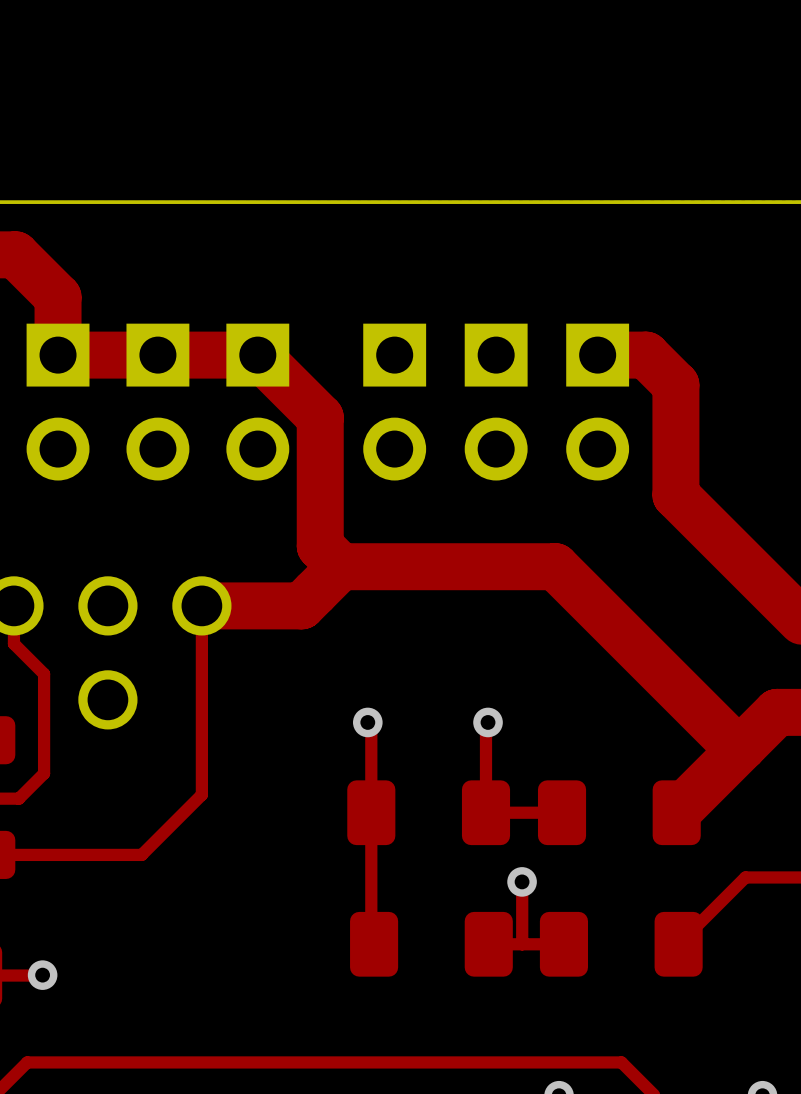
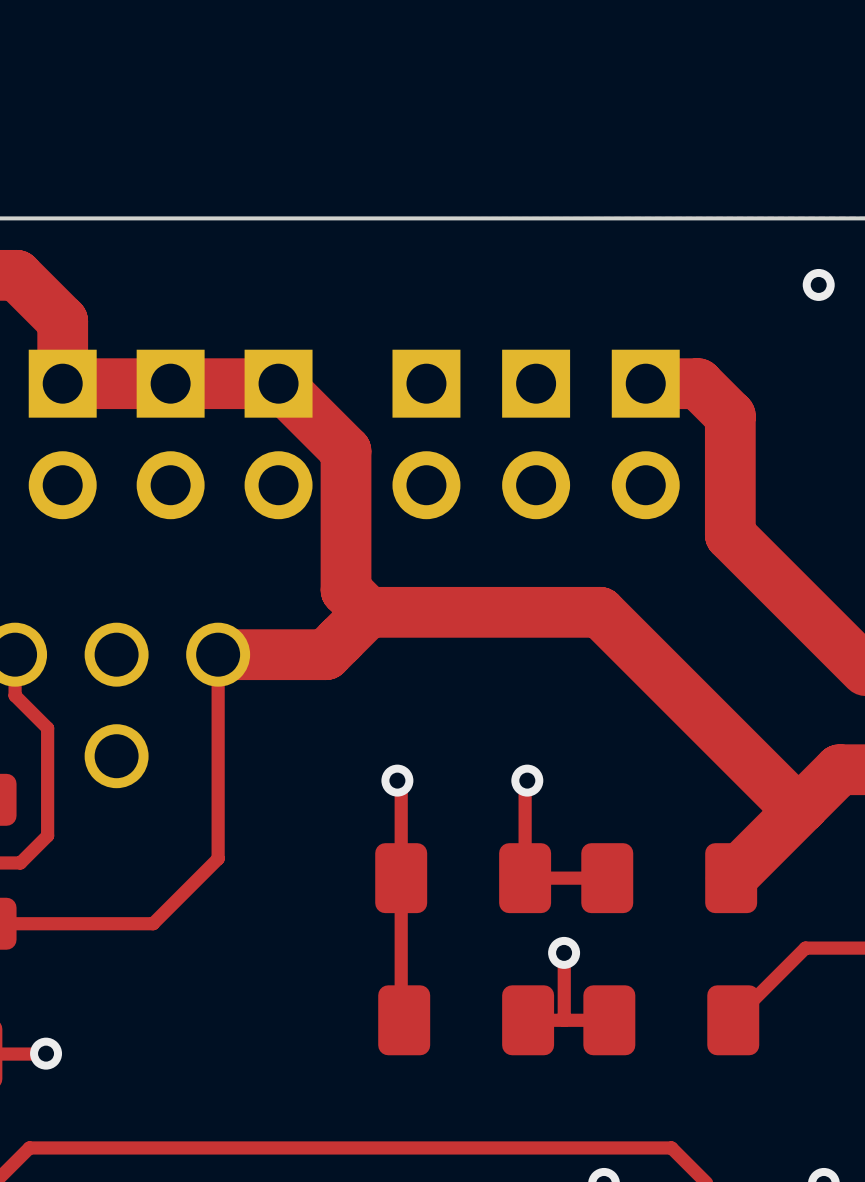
via: none -> (818, 284)

